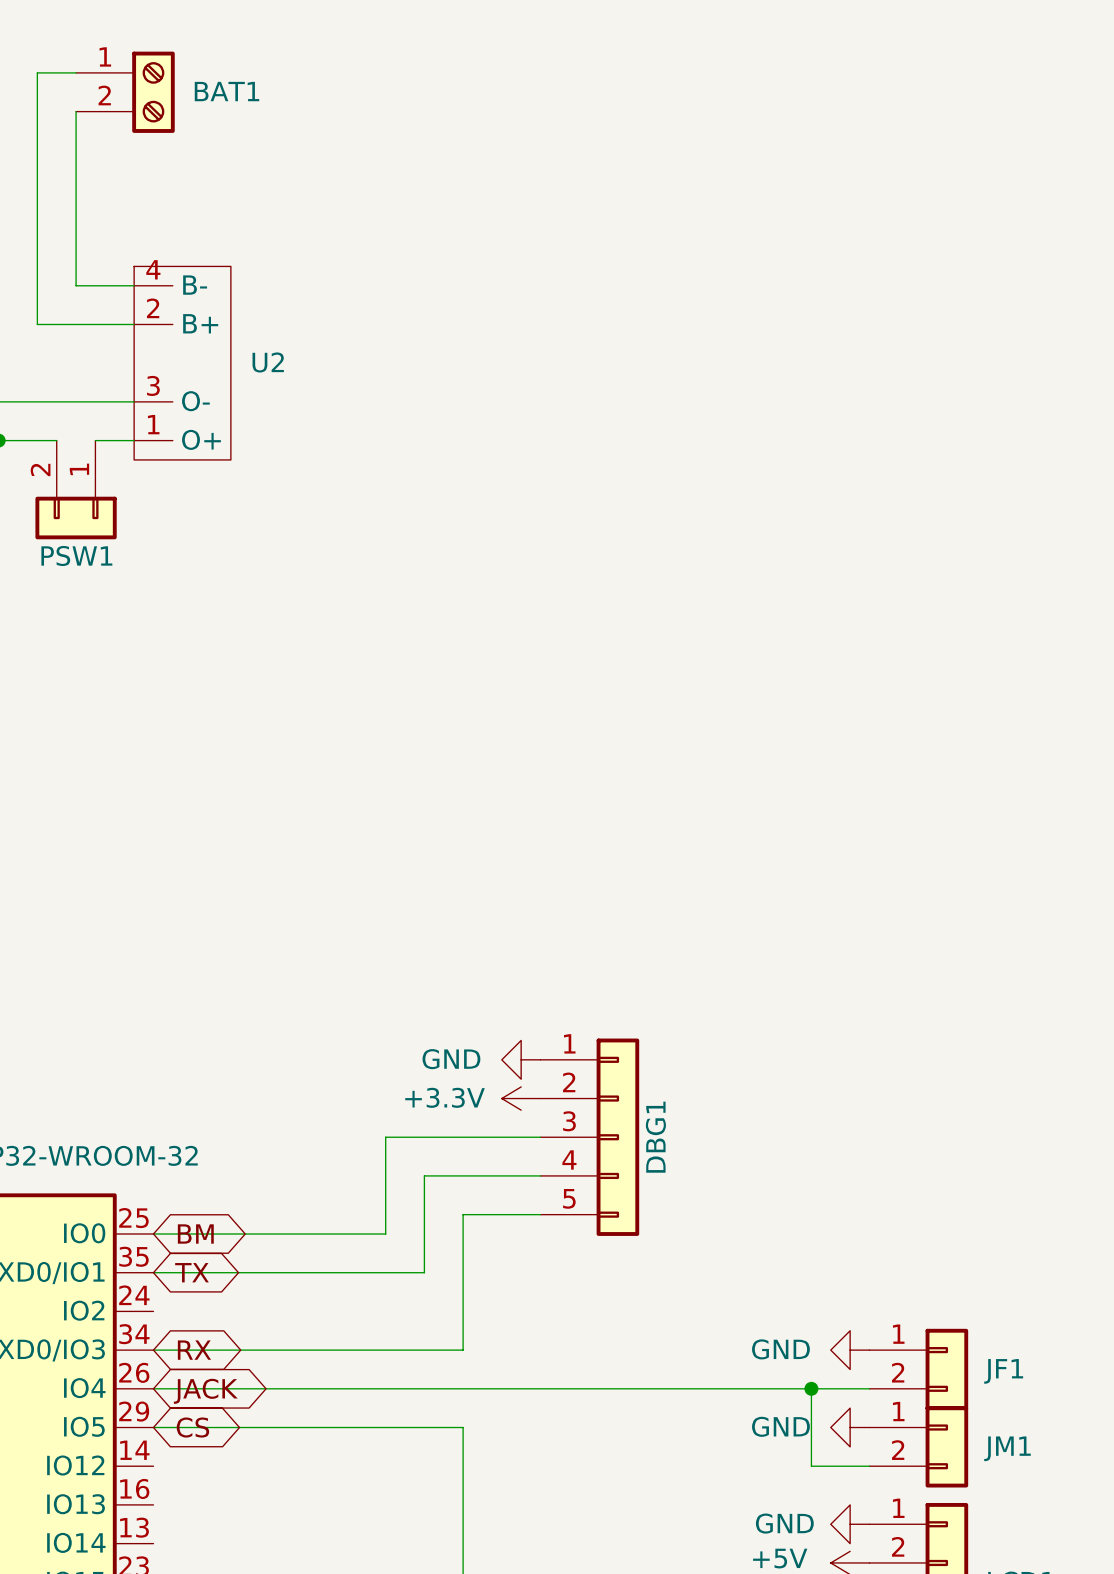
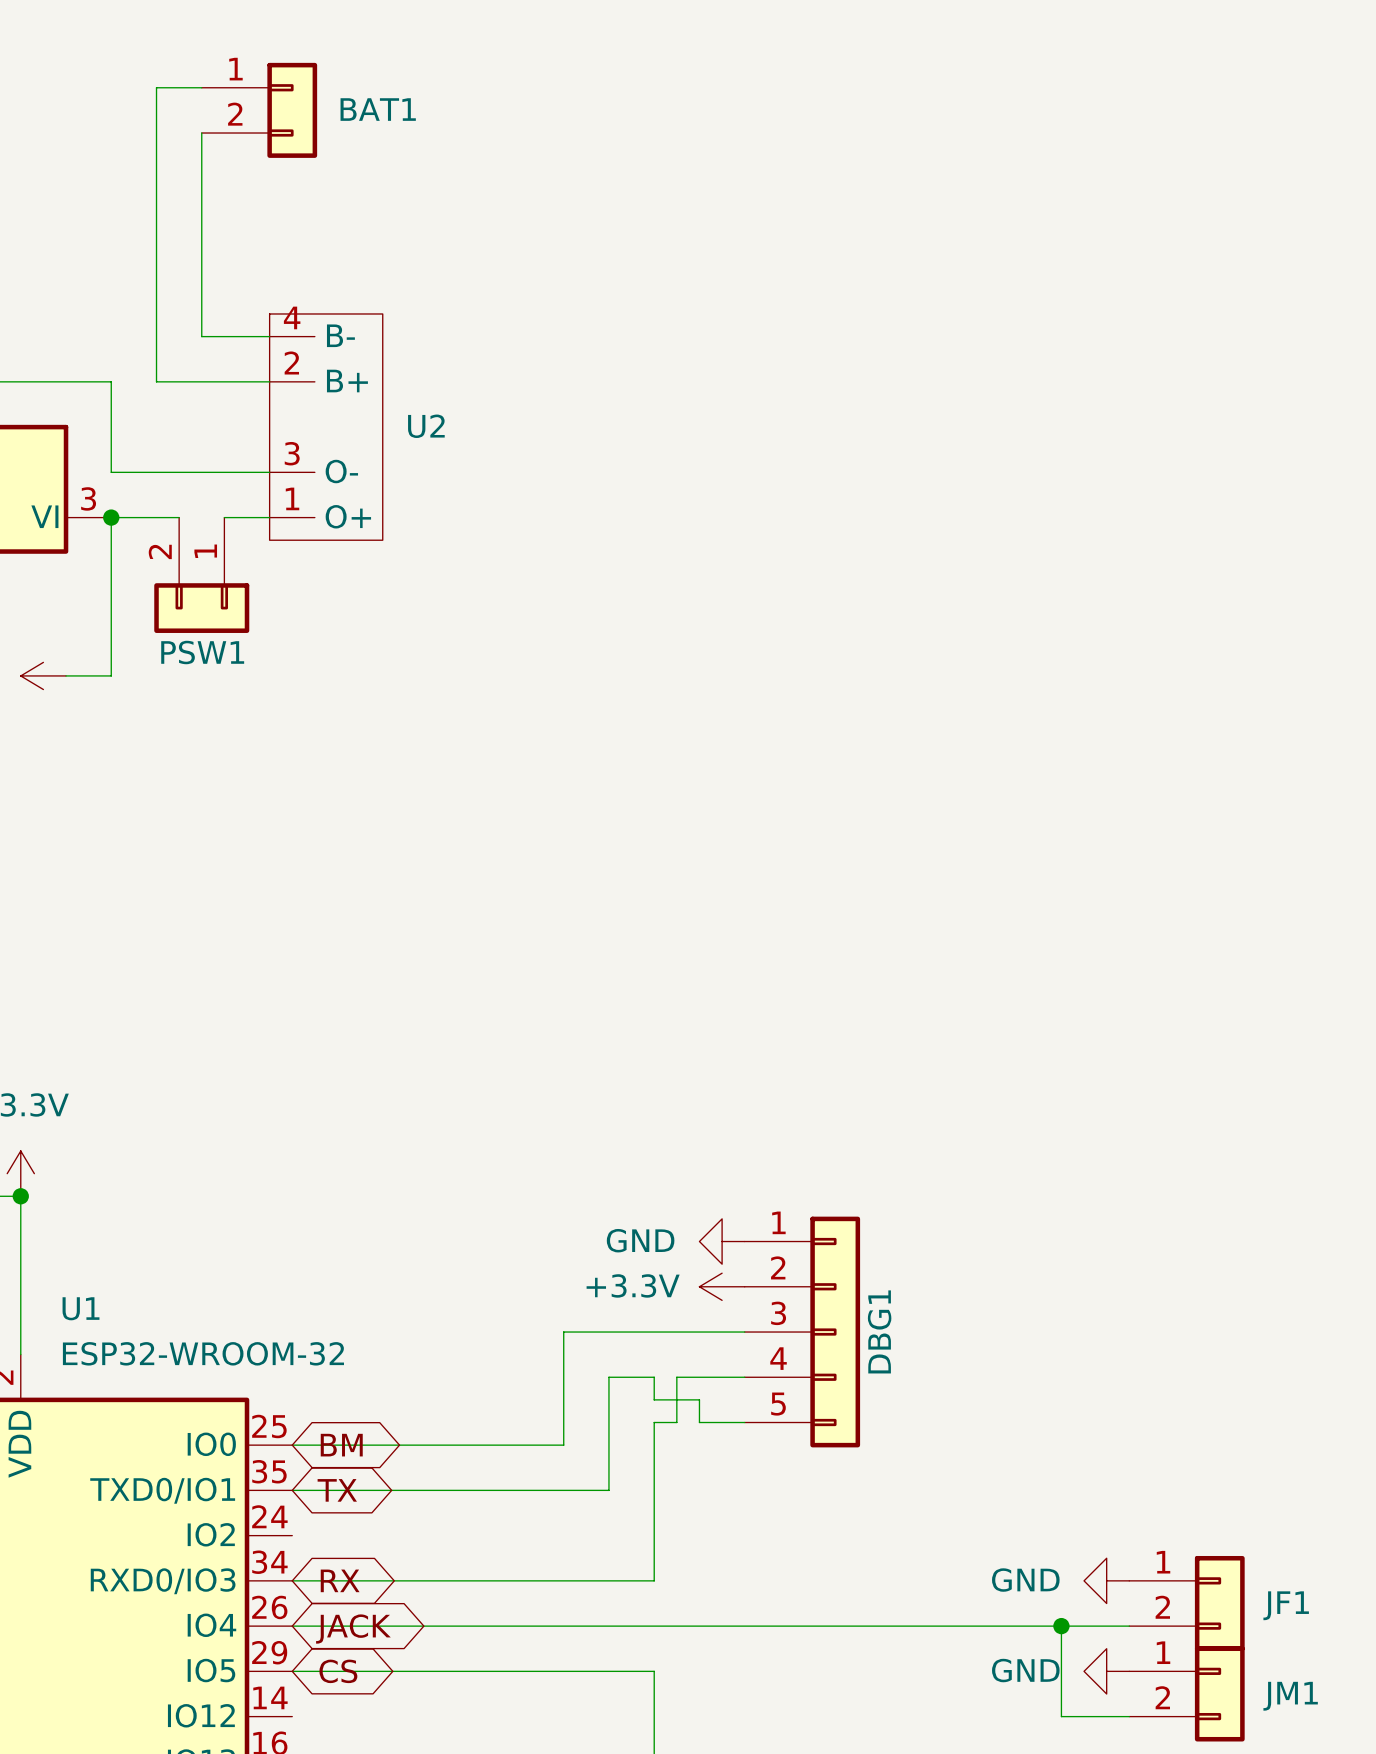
BAT1 symbol: [76, 51, 175, 133] -> [201, 62, 318, 158]
wire: (463, 1175) (482, 1175) -> (676, 1422) (676, 1377)
wire: (482, 1214) (501, 1214) -> (654, 1377) (654, 1399) (699, 1399) (699, 1422)

